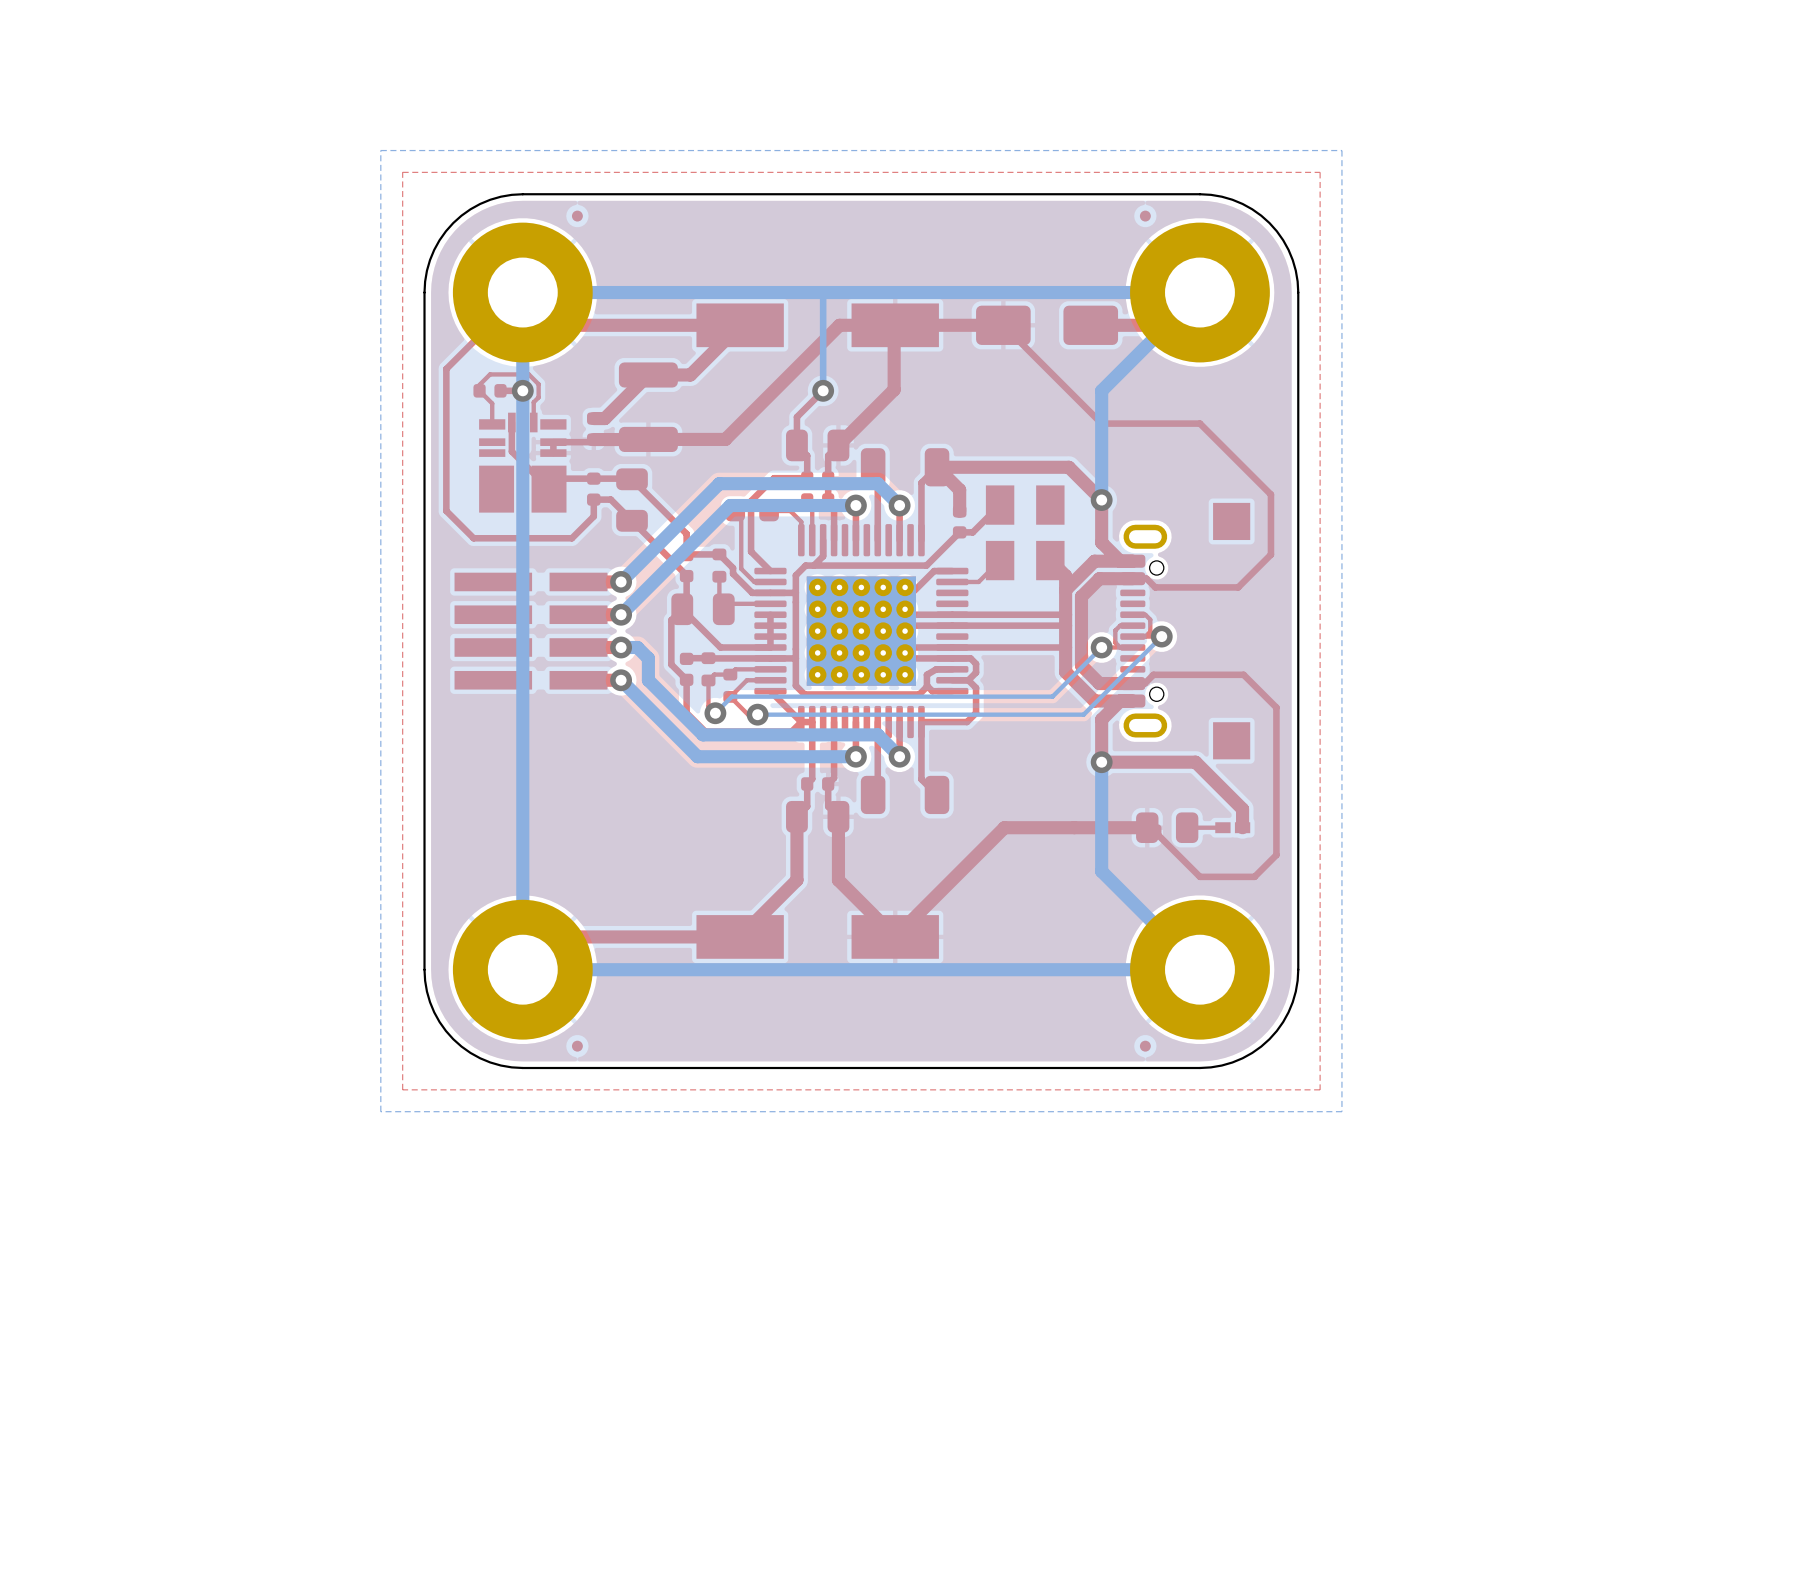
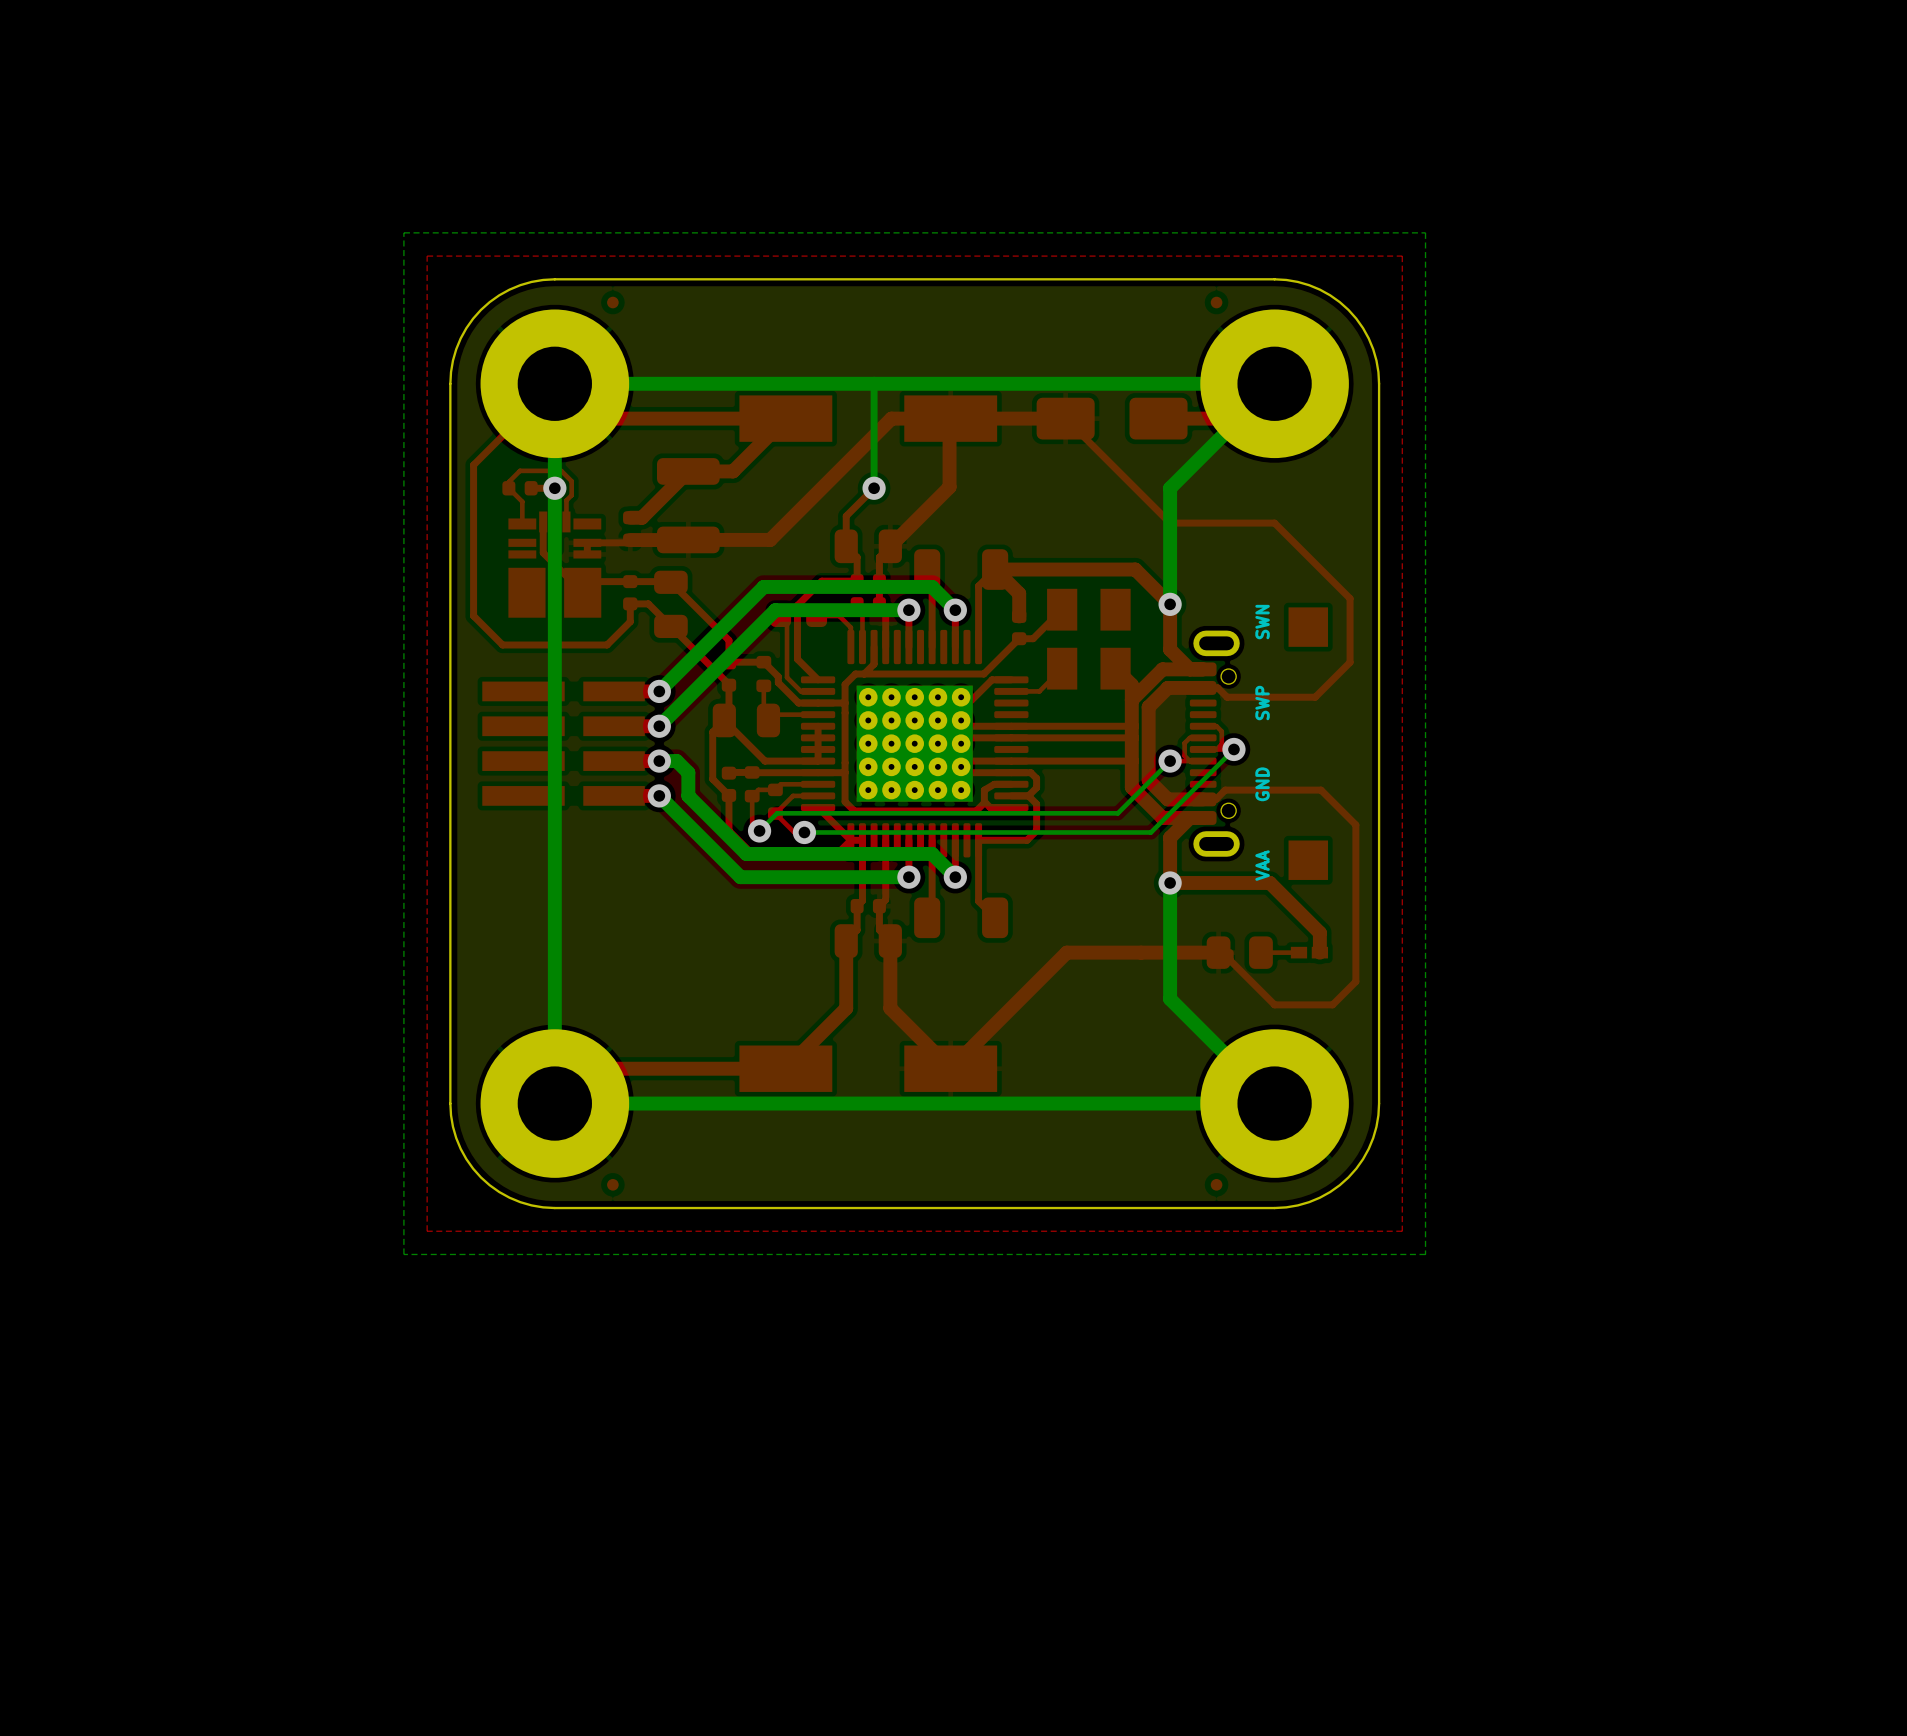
text: none -> SWN (1262, 622)
text: none -> SWP (1262, 703)
text: none -> GND (1262, 784)
text: none -> VAA (1262, 865)

